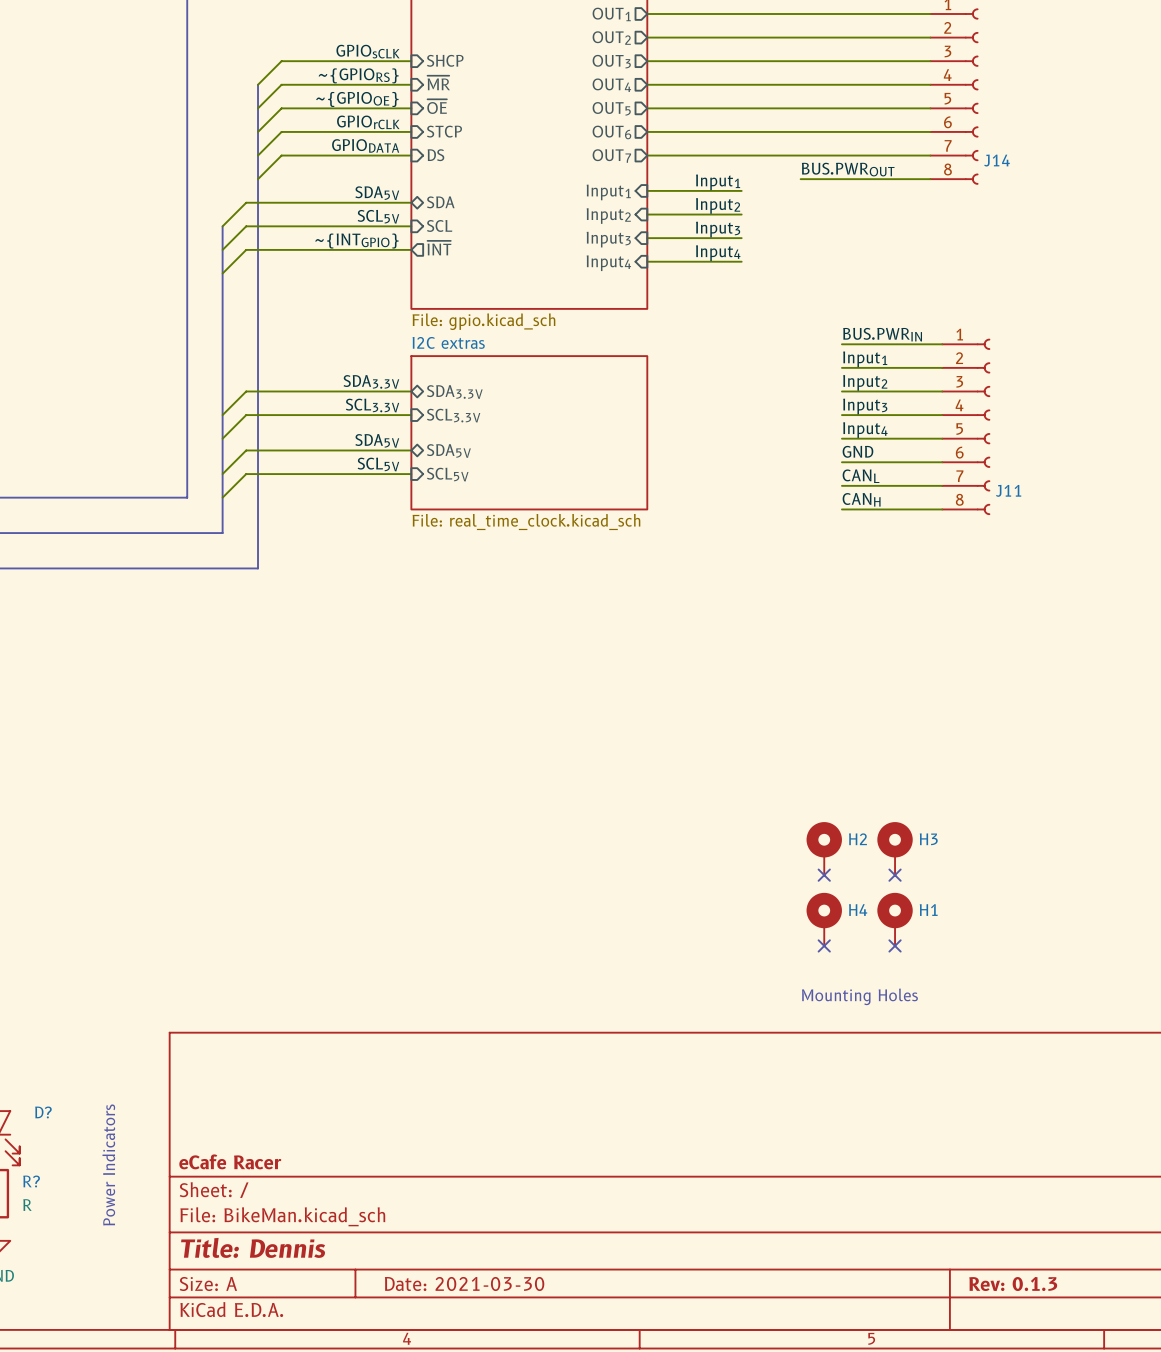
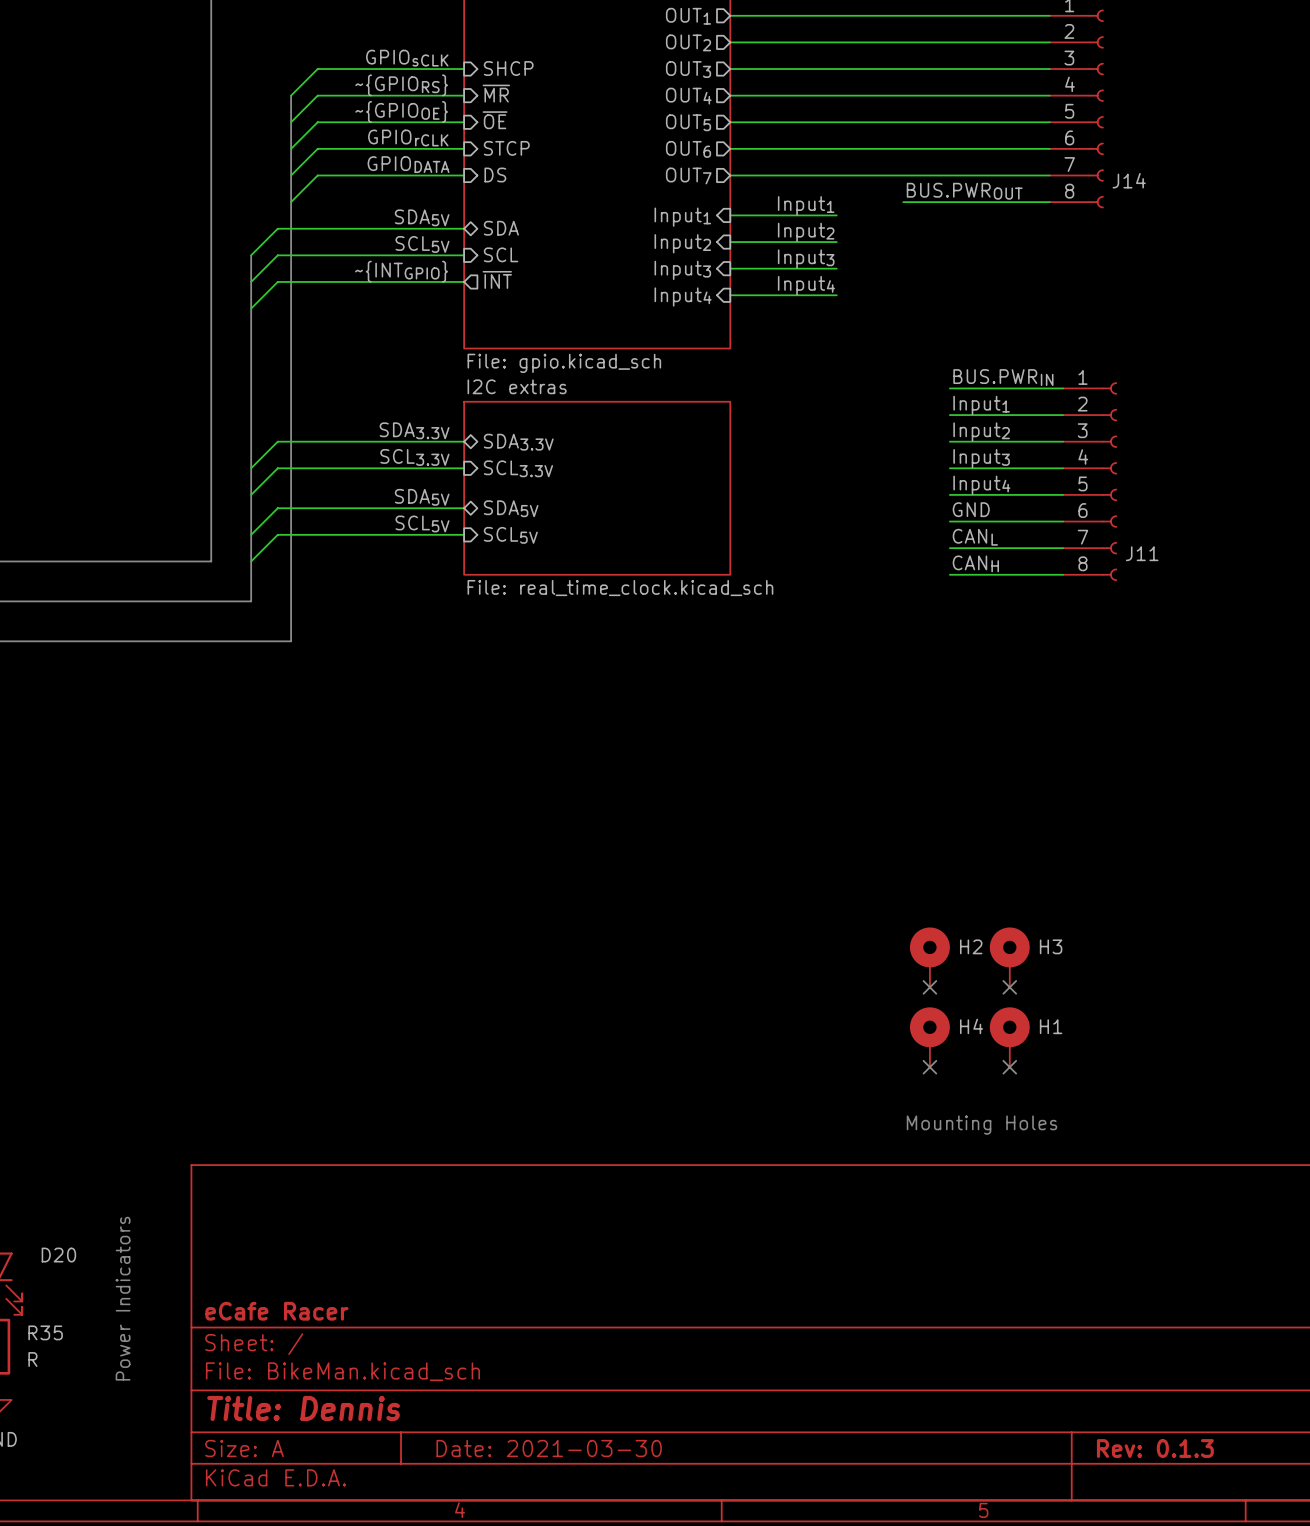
D? name: D? (43, 1112) -> D20 (58, 1255)
R? name: R? (31, 1181) -> R35 (45, 1332)

